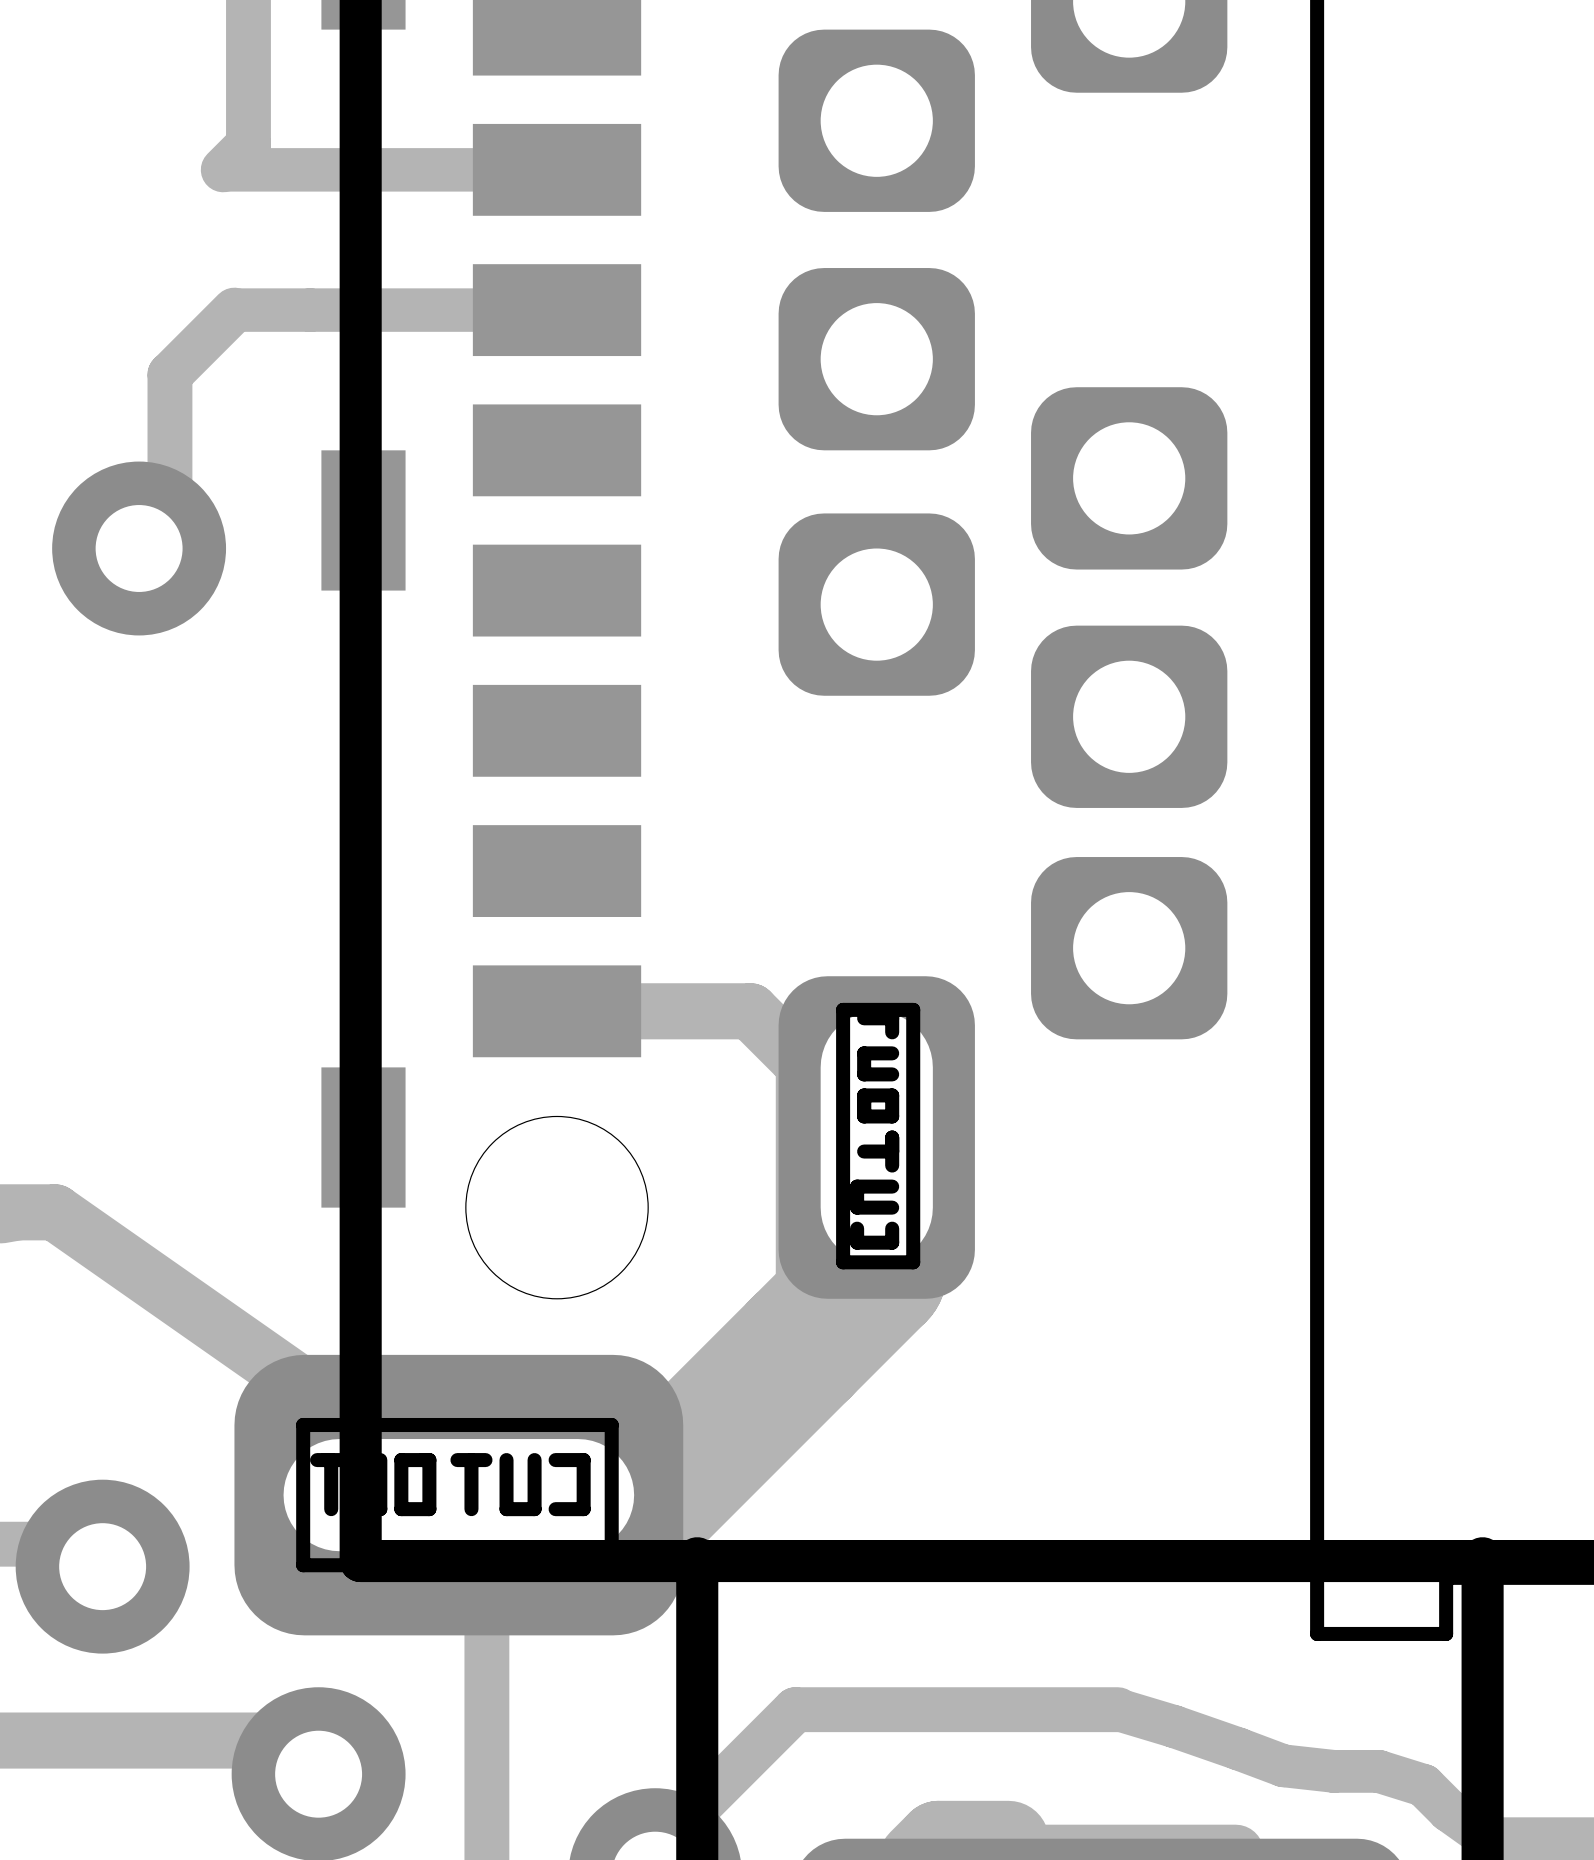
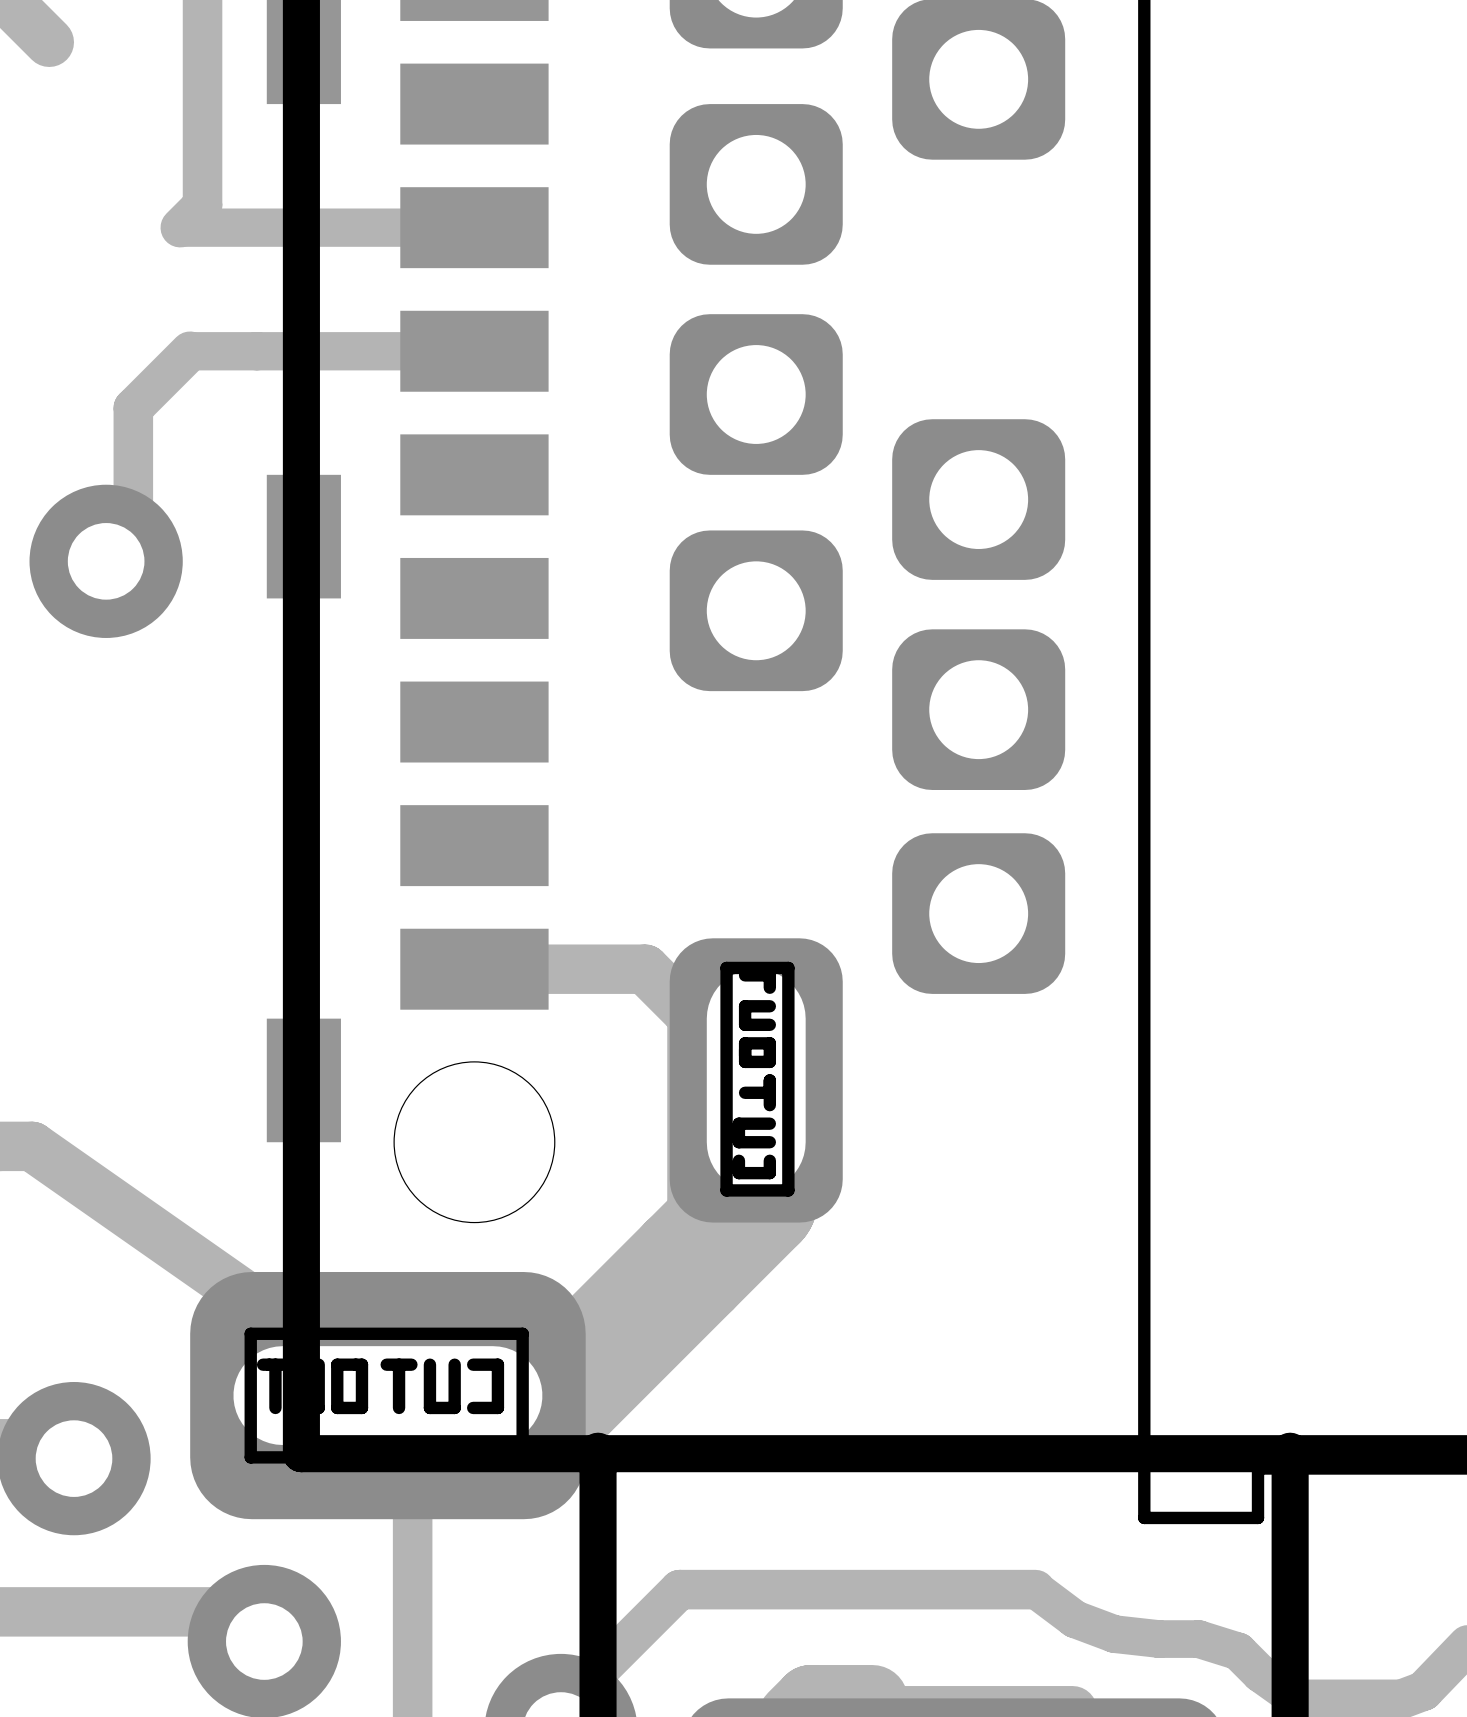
track: (789, 1715) (795, 1709) (1117, 1709) (1238, 1748) -> (679, 1589) (1035, 1589) (1075, 1619)

